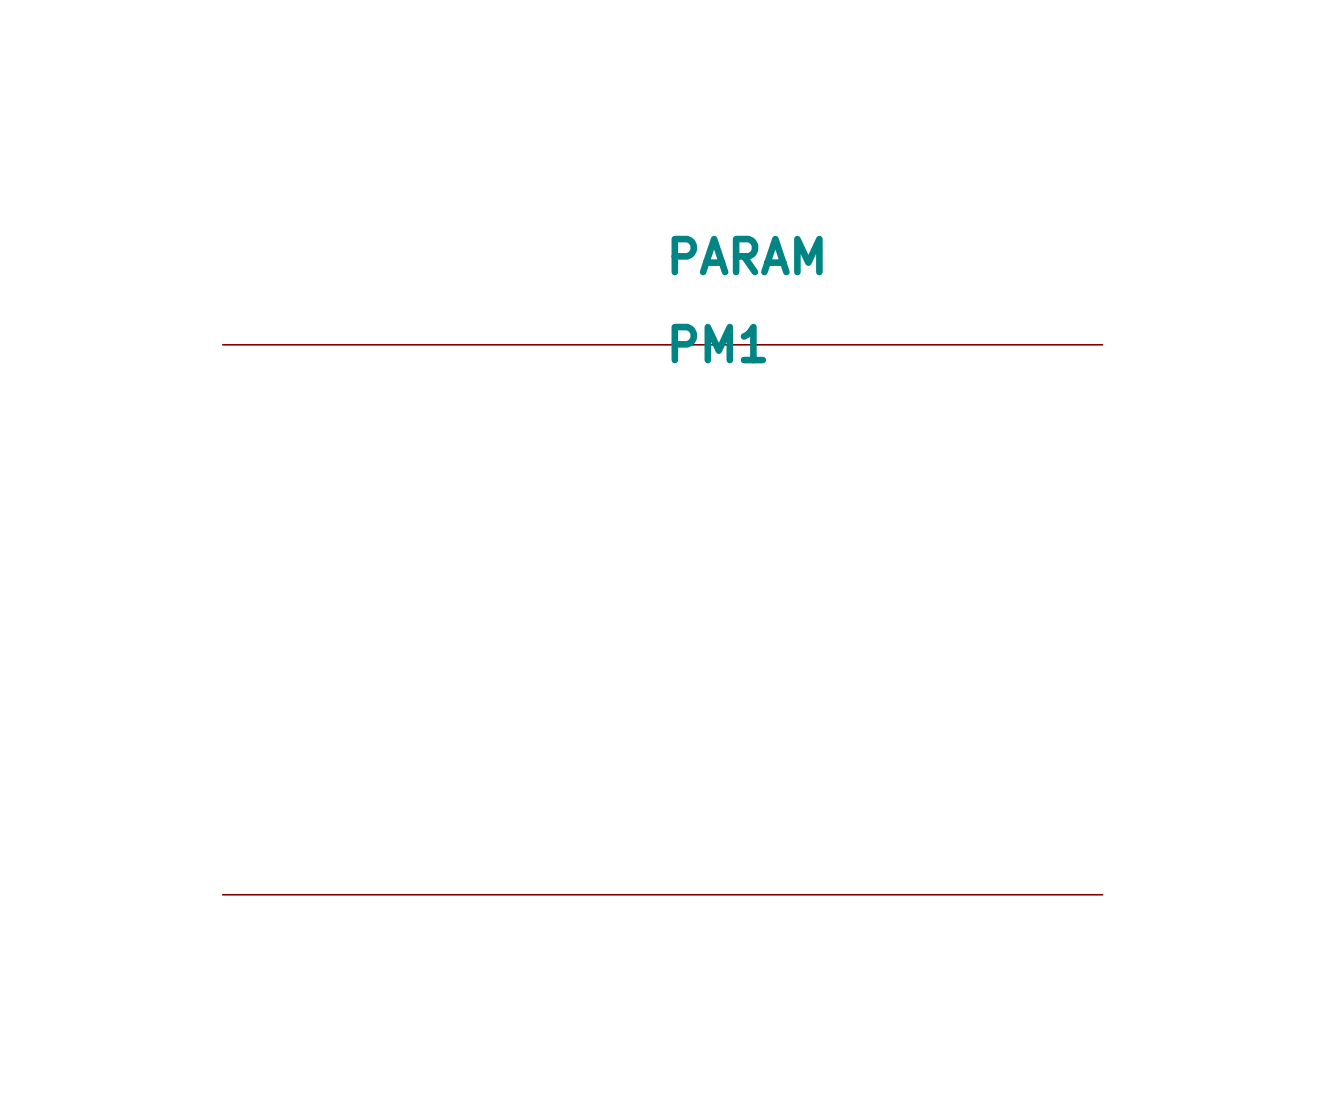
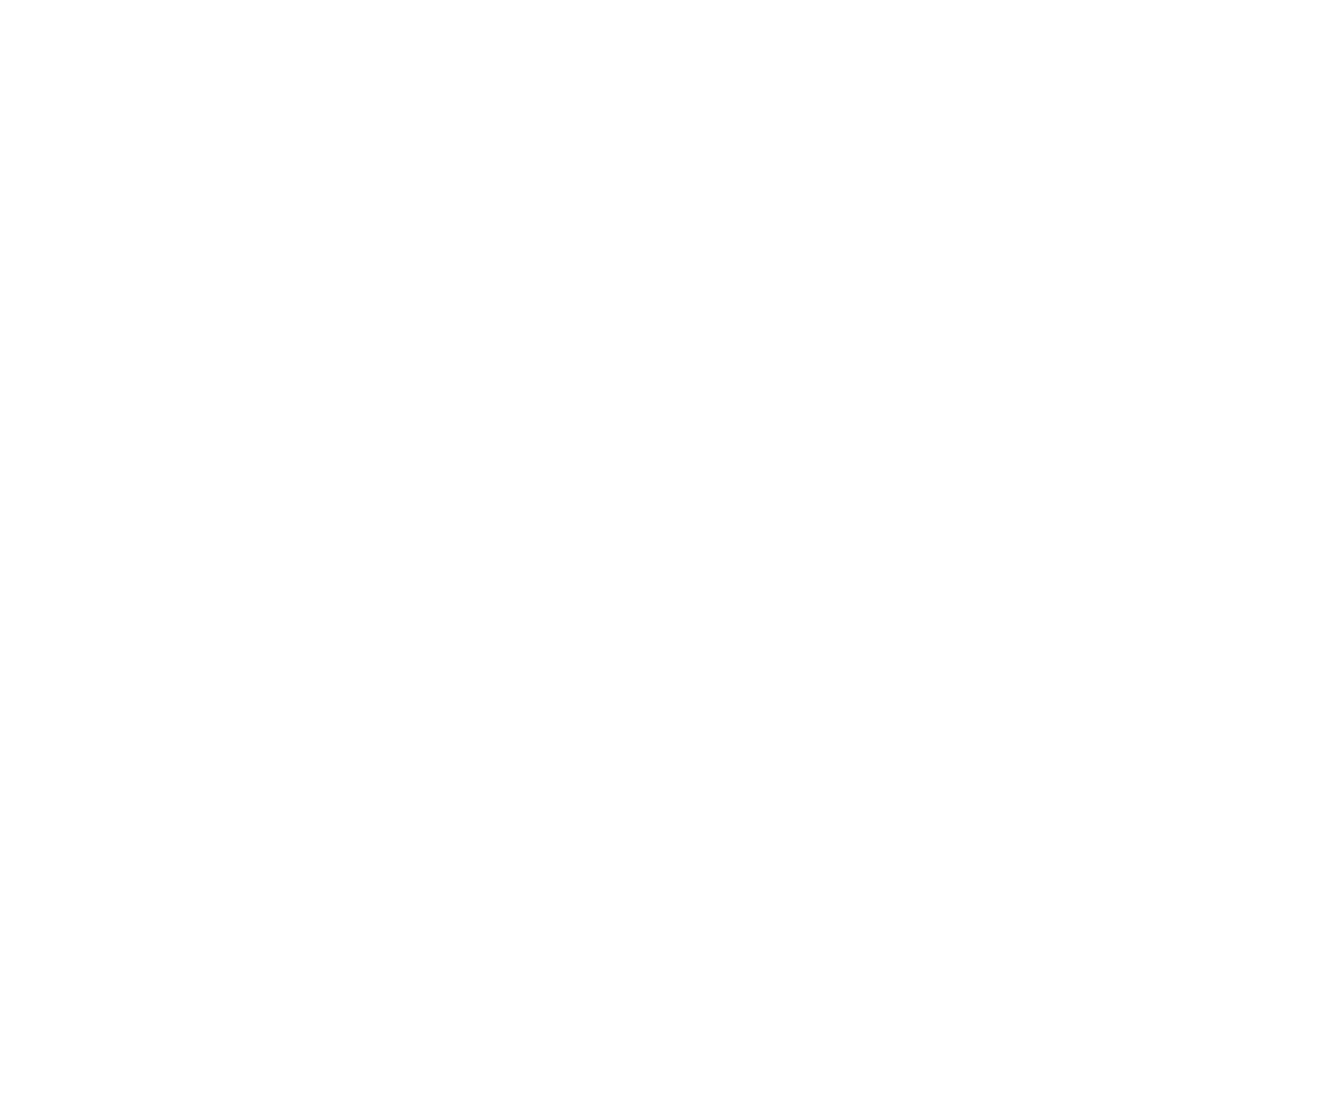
PM1: PARAM (662, 344) -> none
part: (662, 894) -> none

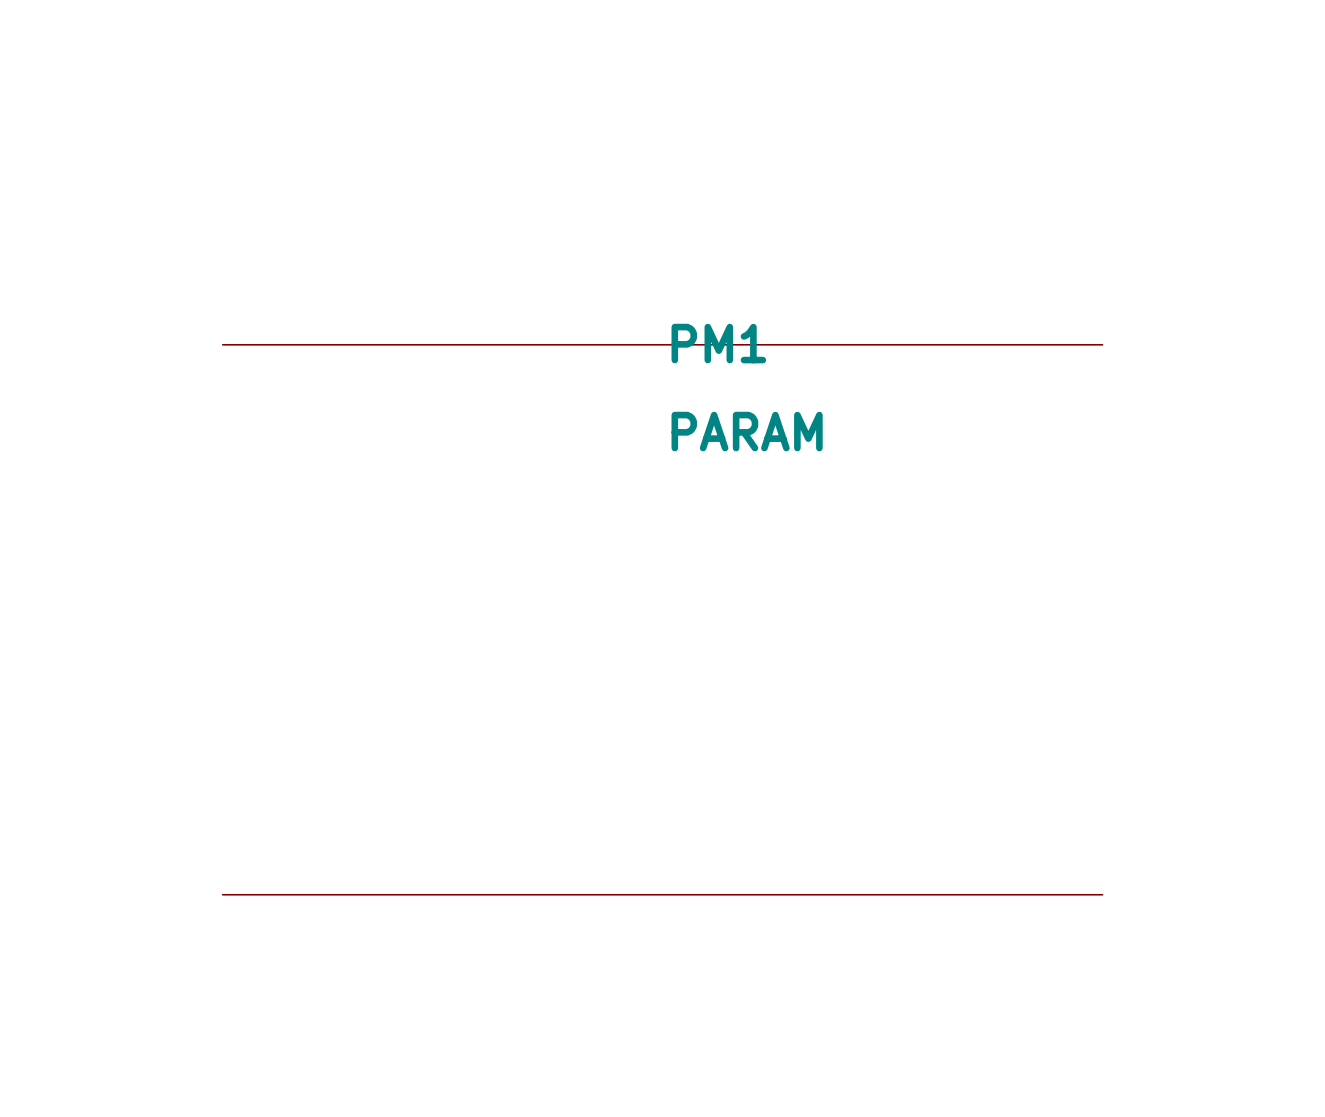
PM1: none -> PARAM (662, 344)
part: none -> (662, 894)

